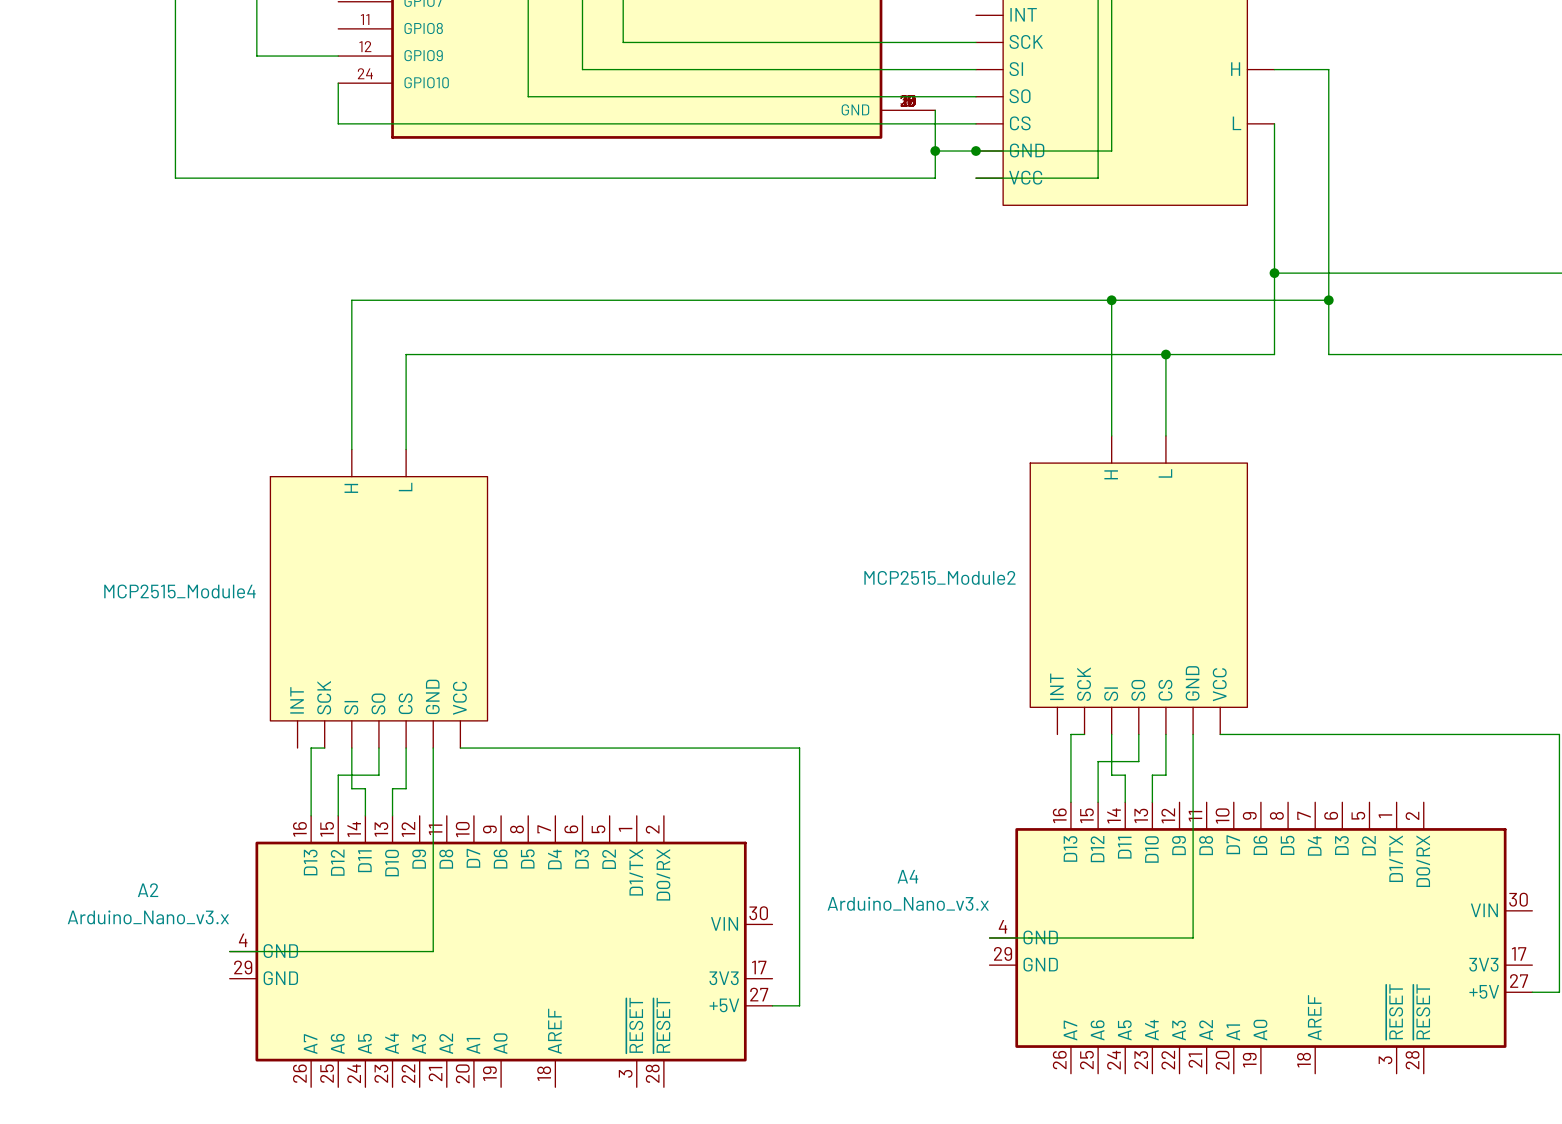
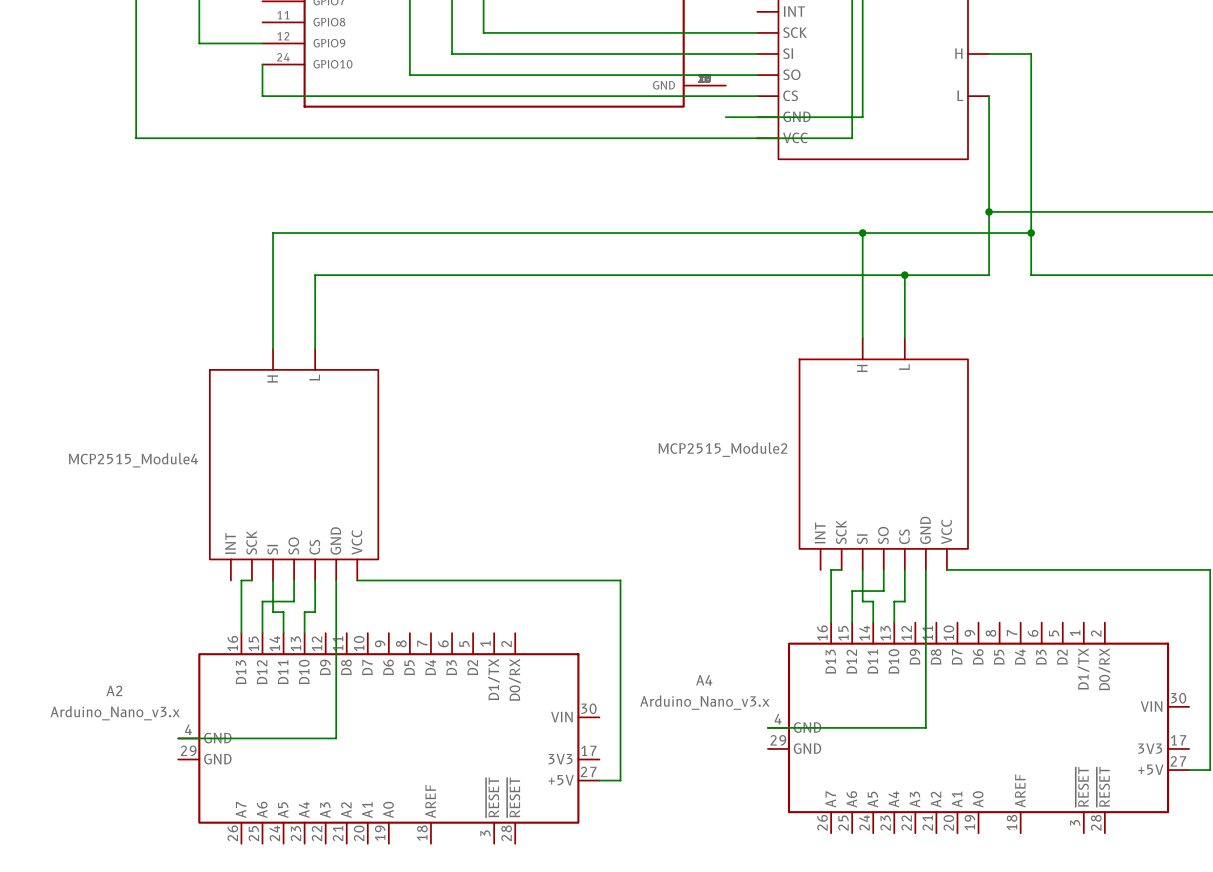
wire: (935, 110) (935, 178) -> (757, 138) (725, 138)
junction: (935, 151) -> none
junction: (975, 151) -> none

